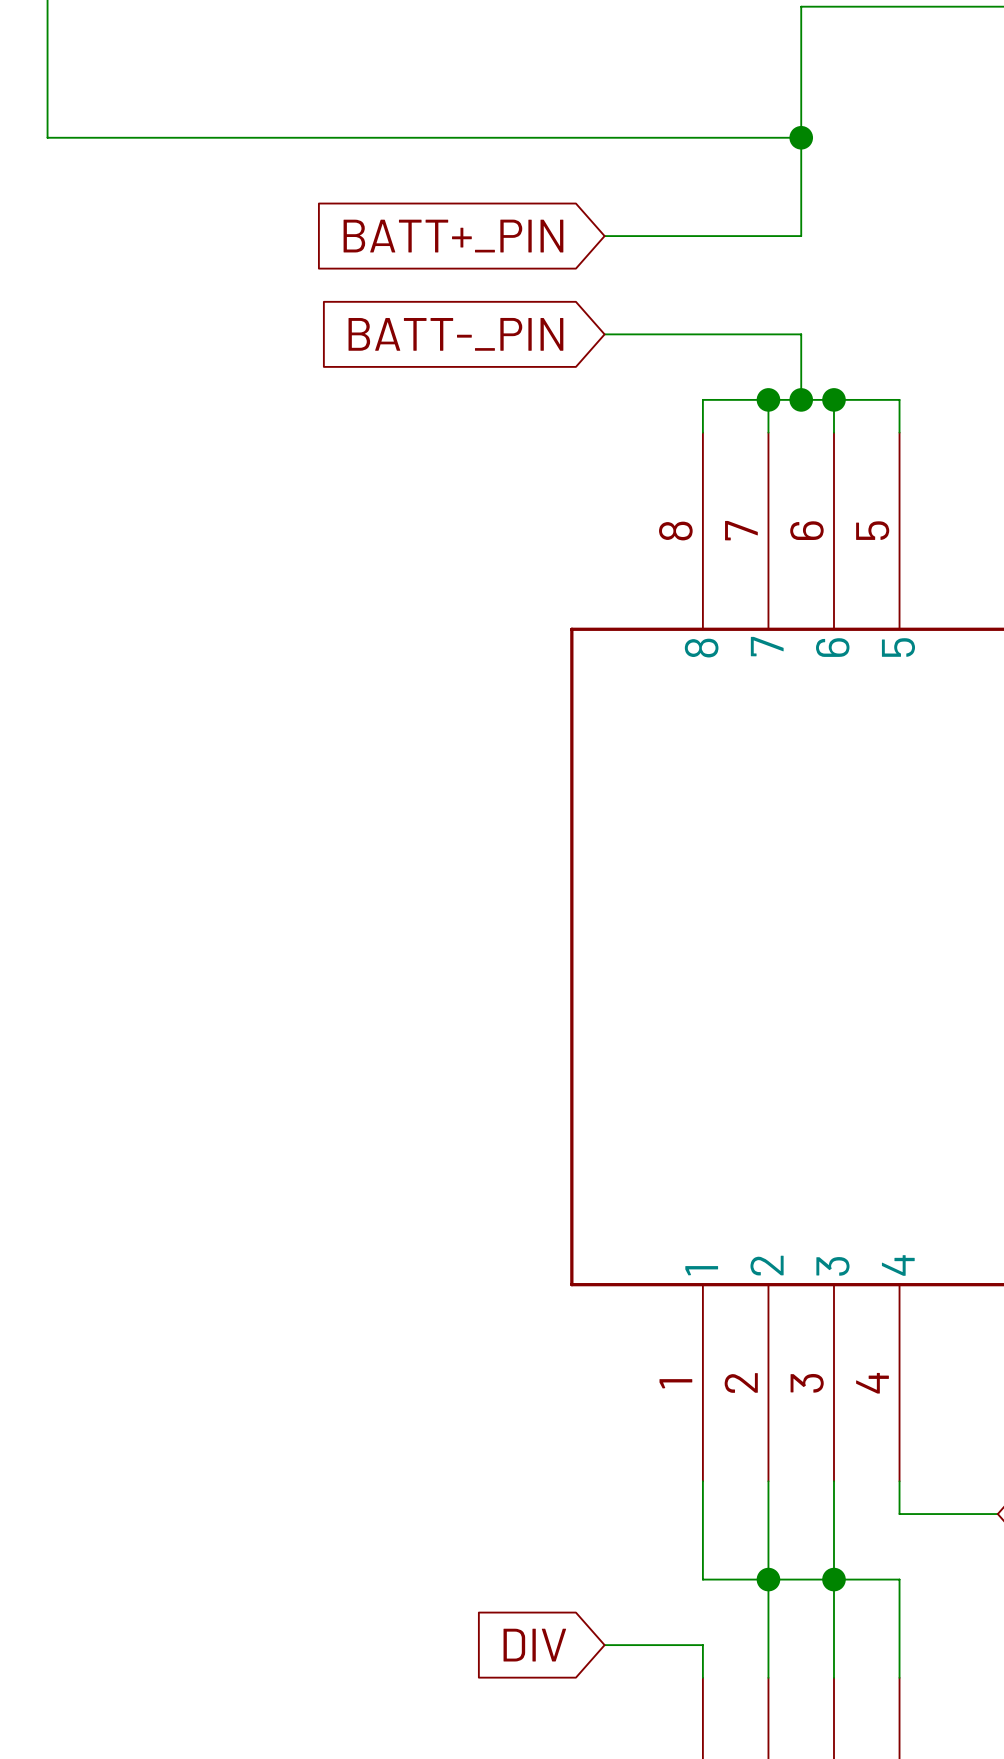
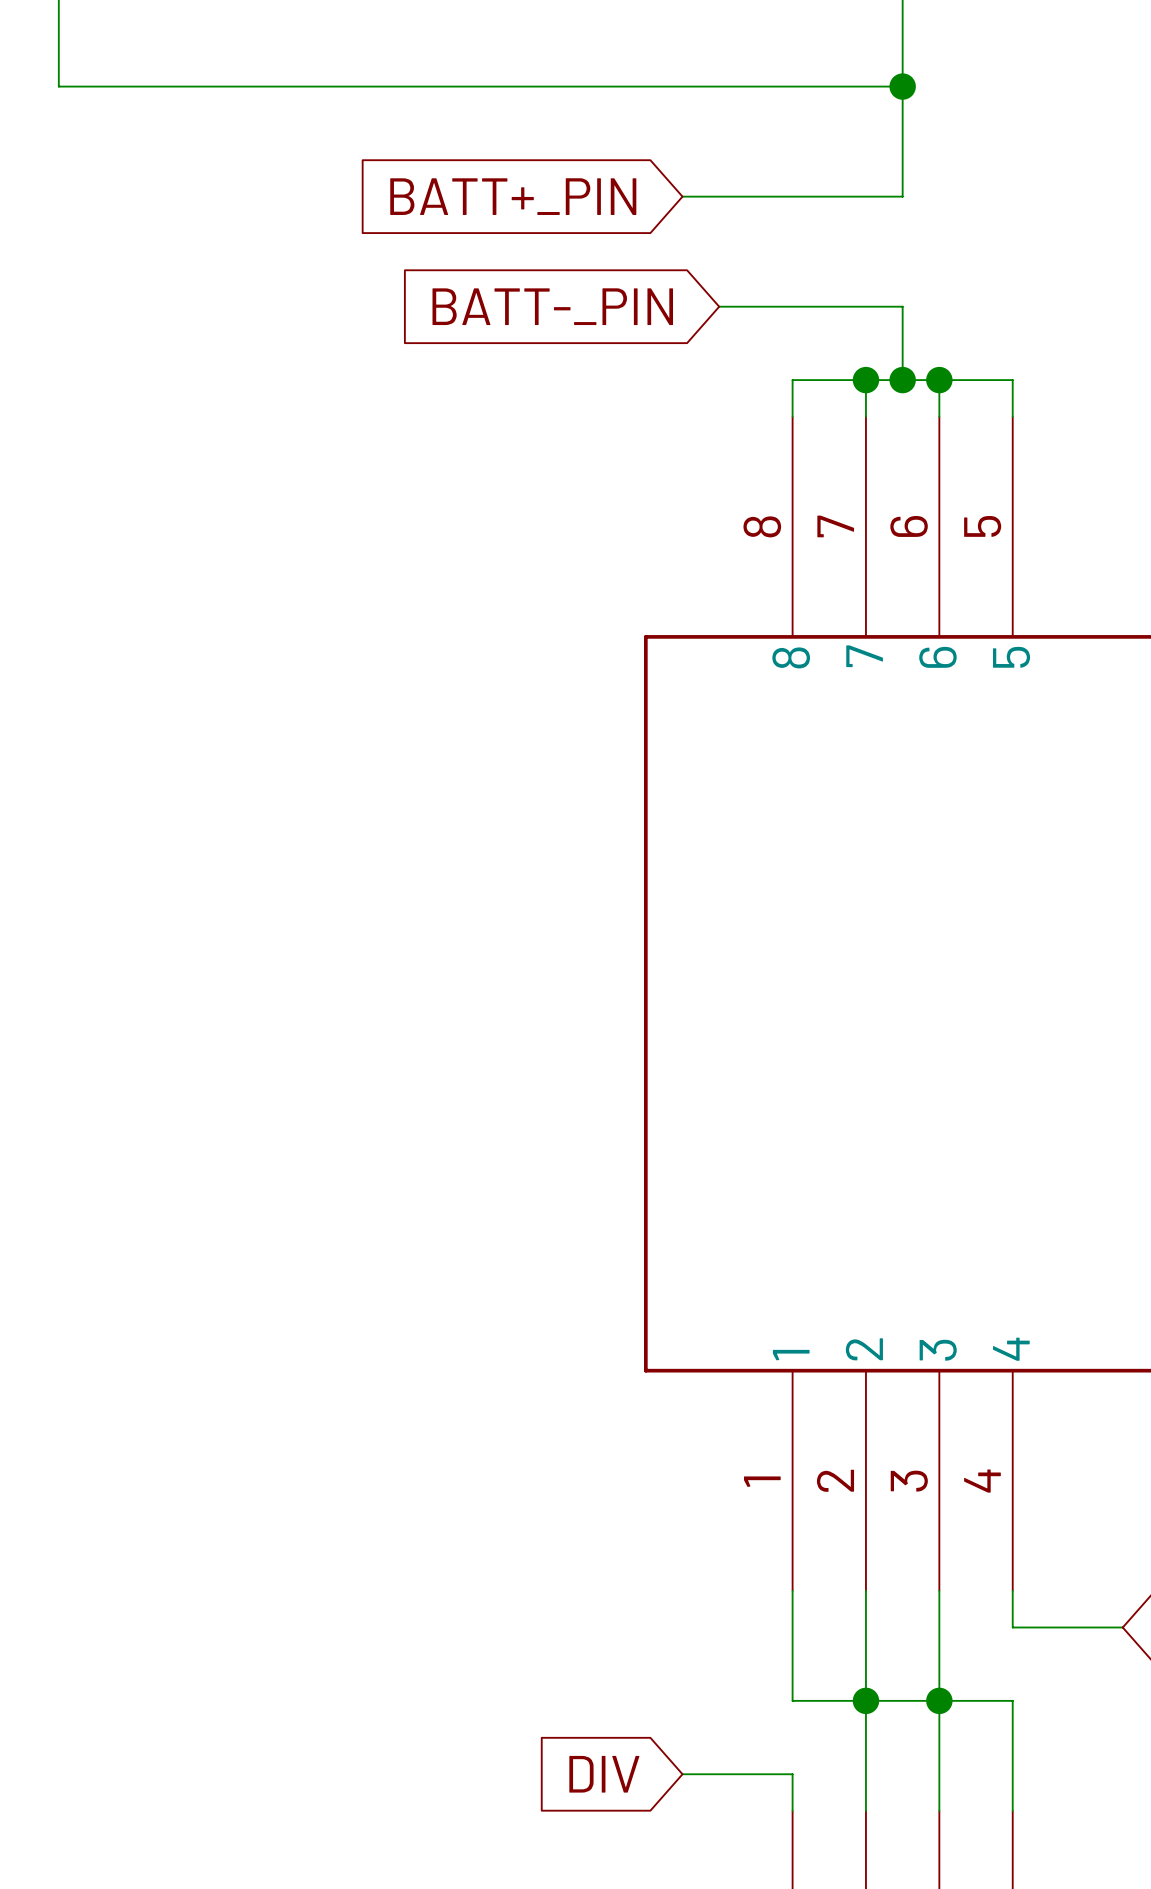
global label position: BATT-_PIN (455, 334) -> BATT-_PIN (552, 306)
wire: (604, 334) (637, 334) -> none

